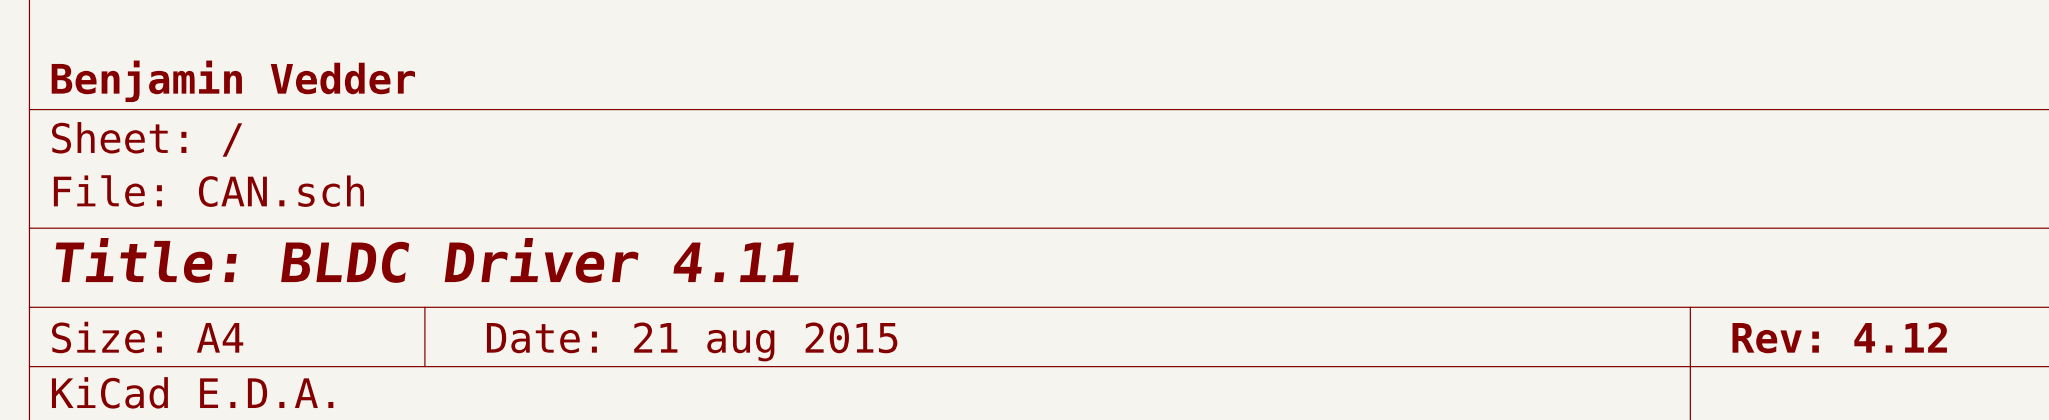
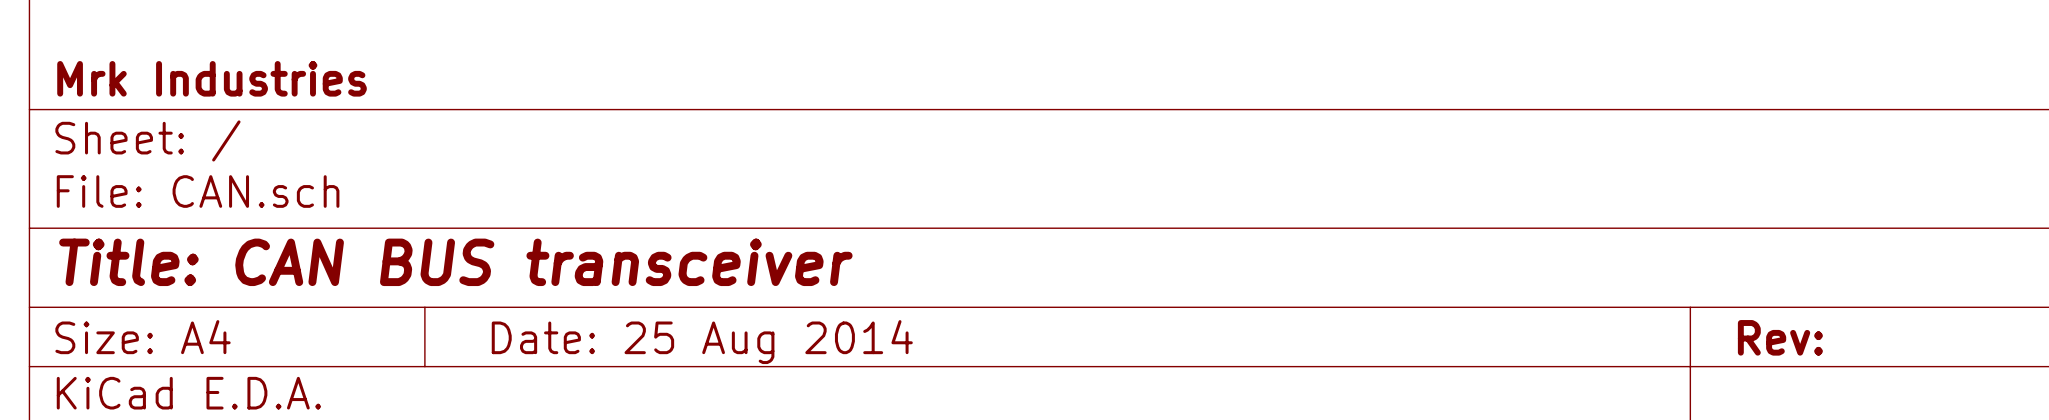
title block: Benjamin Vedder (233, 81) -> Mrk Industries (212, 78)
title block: Title: BLDC Driver 4.11 (427, 260) -> Title: CAN BUS transceiver (455, 262)
title block: Rev: 4.12 (1839, 337) -> Rev: (1780, 337)
title block: Date: 21 aug 2015 (692, 341) -> Date: 25 Aug 2014 (702, 342)

